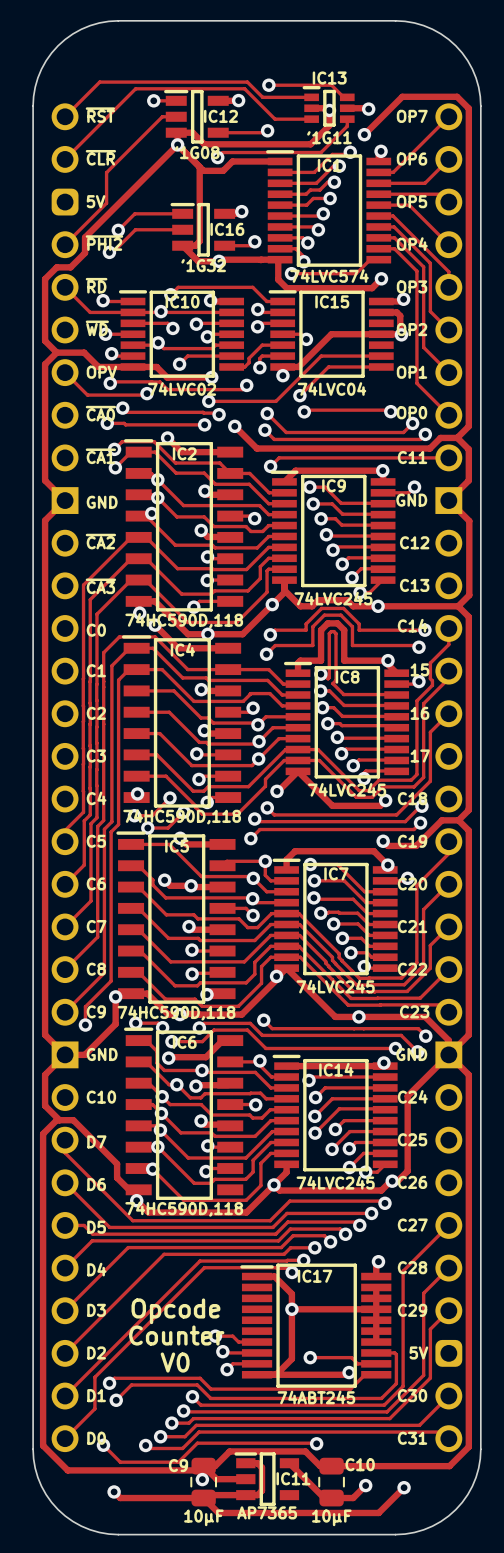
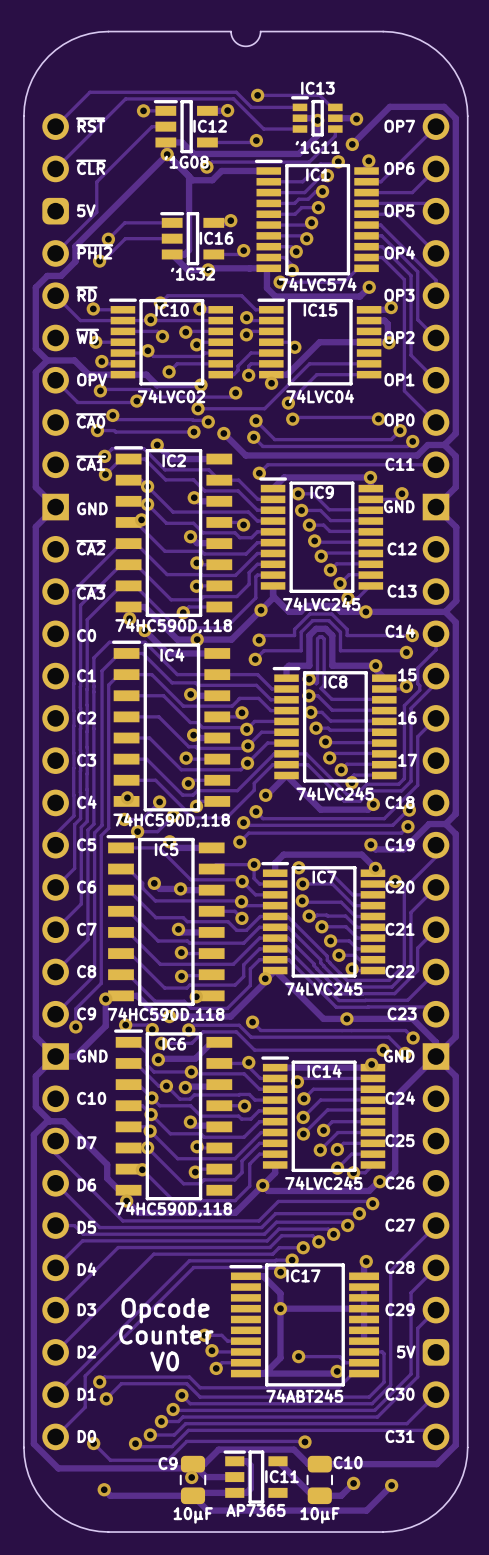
part footprint: [32, 19, 482, 1536] -> [23, 30, 469, 1533]

